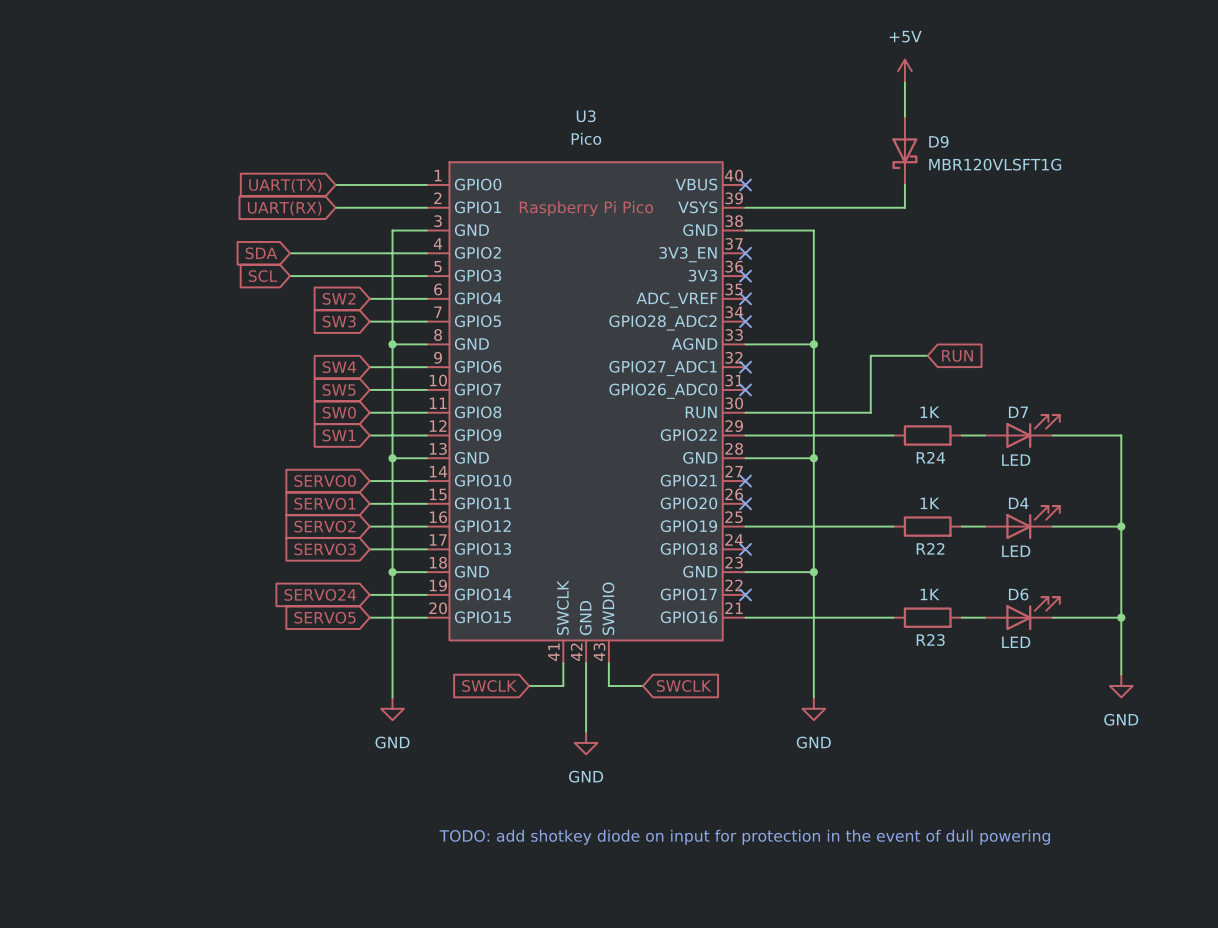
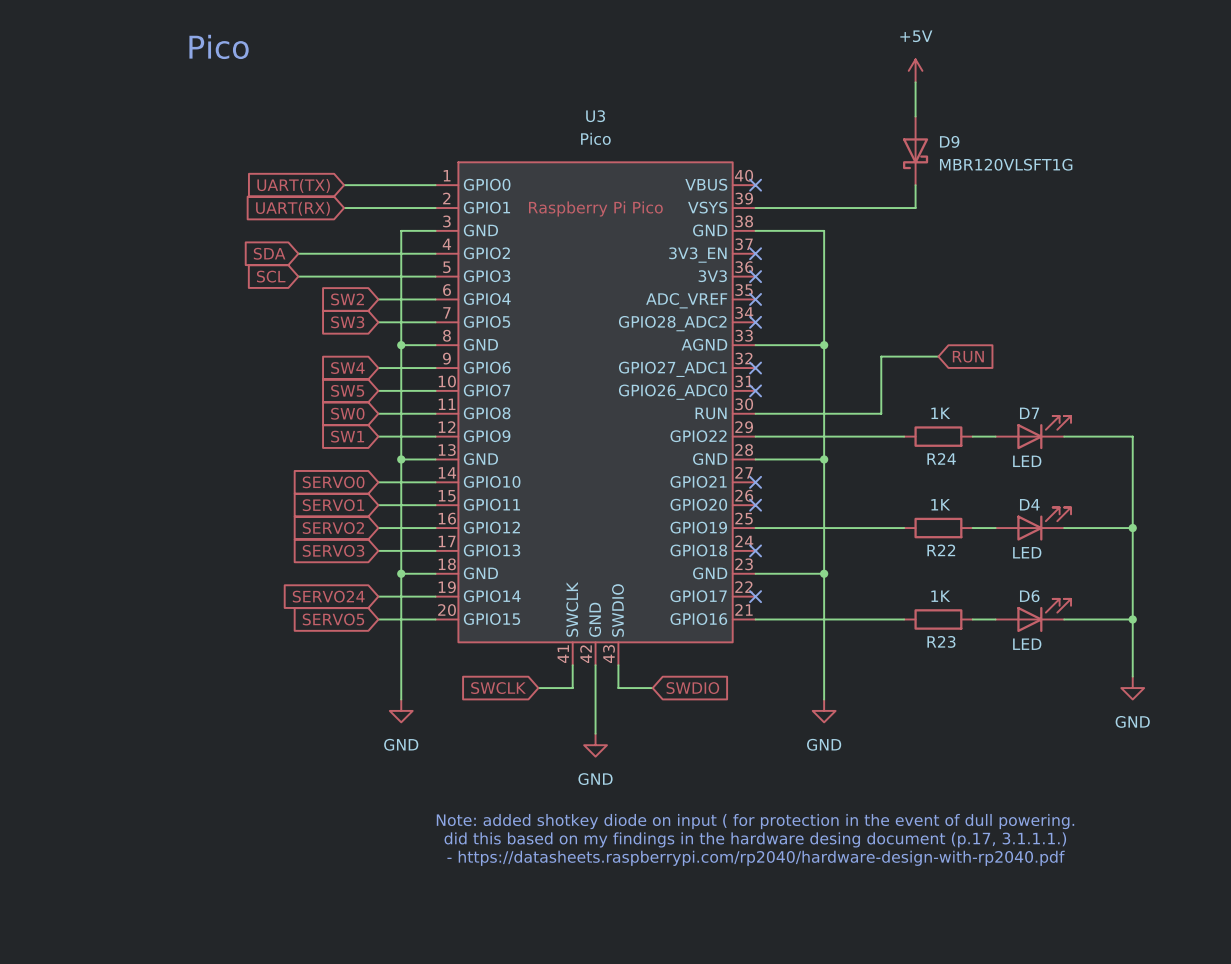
text: none -> Pico (219, 46)
global label: SWCLK (684, 686) -> SWDIO (692, 688)
text: none -> Note: added shotkey diode on input ( for protection in the event of dull powering. (755, 821)
text: TODO: add shotkey diode on input for protection in the event of dull powering (744, 837) -> did this based on my findings in the hardware desing document (p.17, 3.1.1.1.) (755, 839)
text: none -> - https://datasheets.raspberrypi.com/rp2040/hardware-design-with-rp2040.pdf (756, 858)

